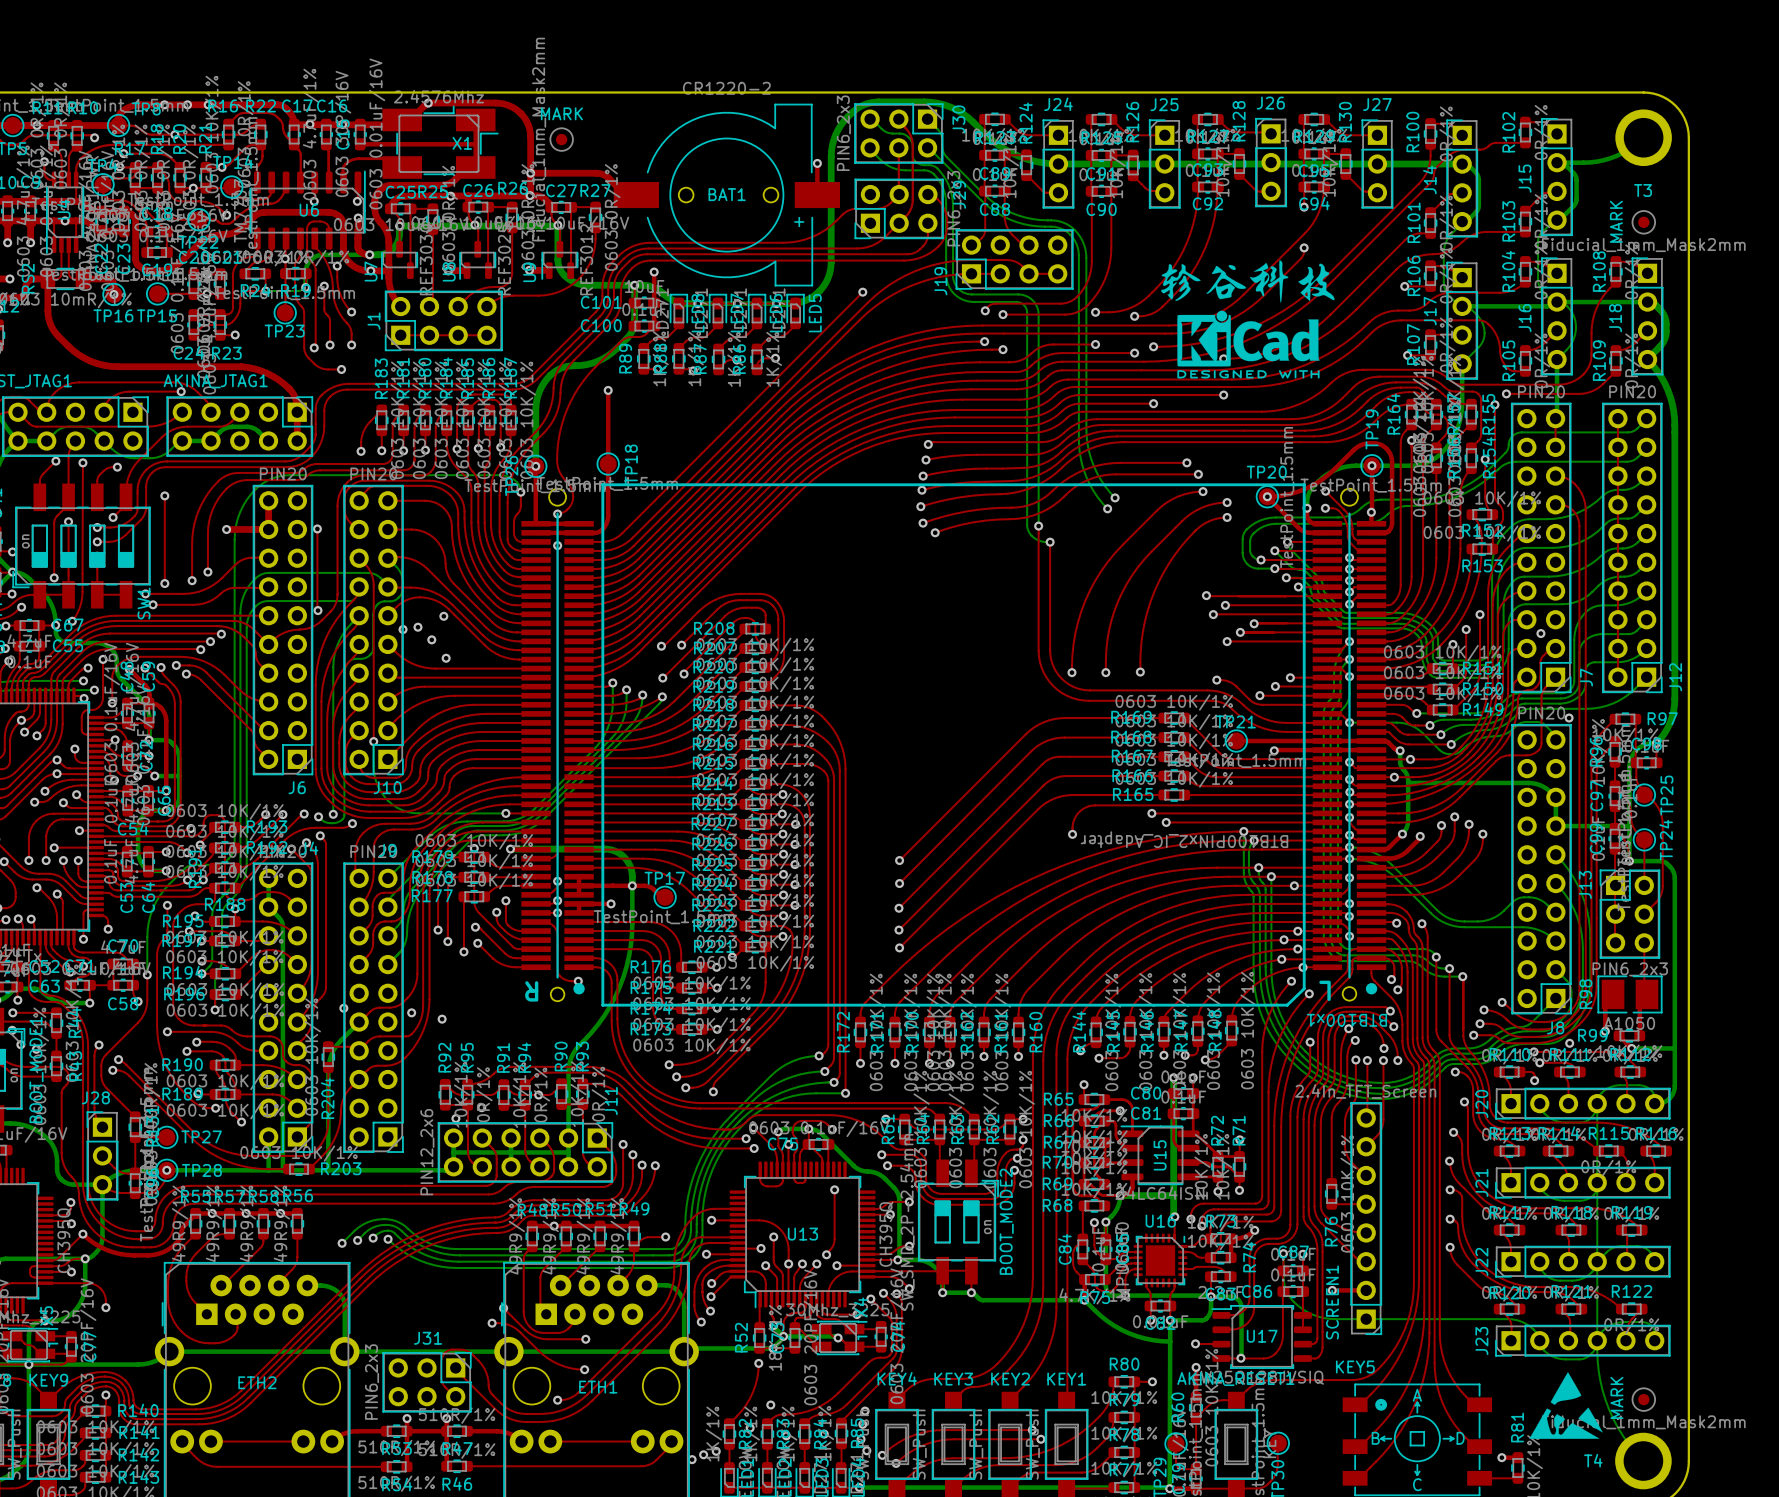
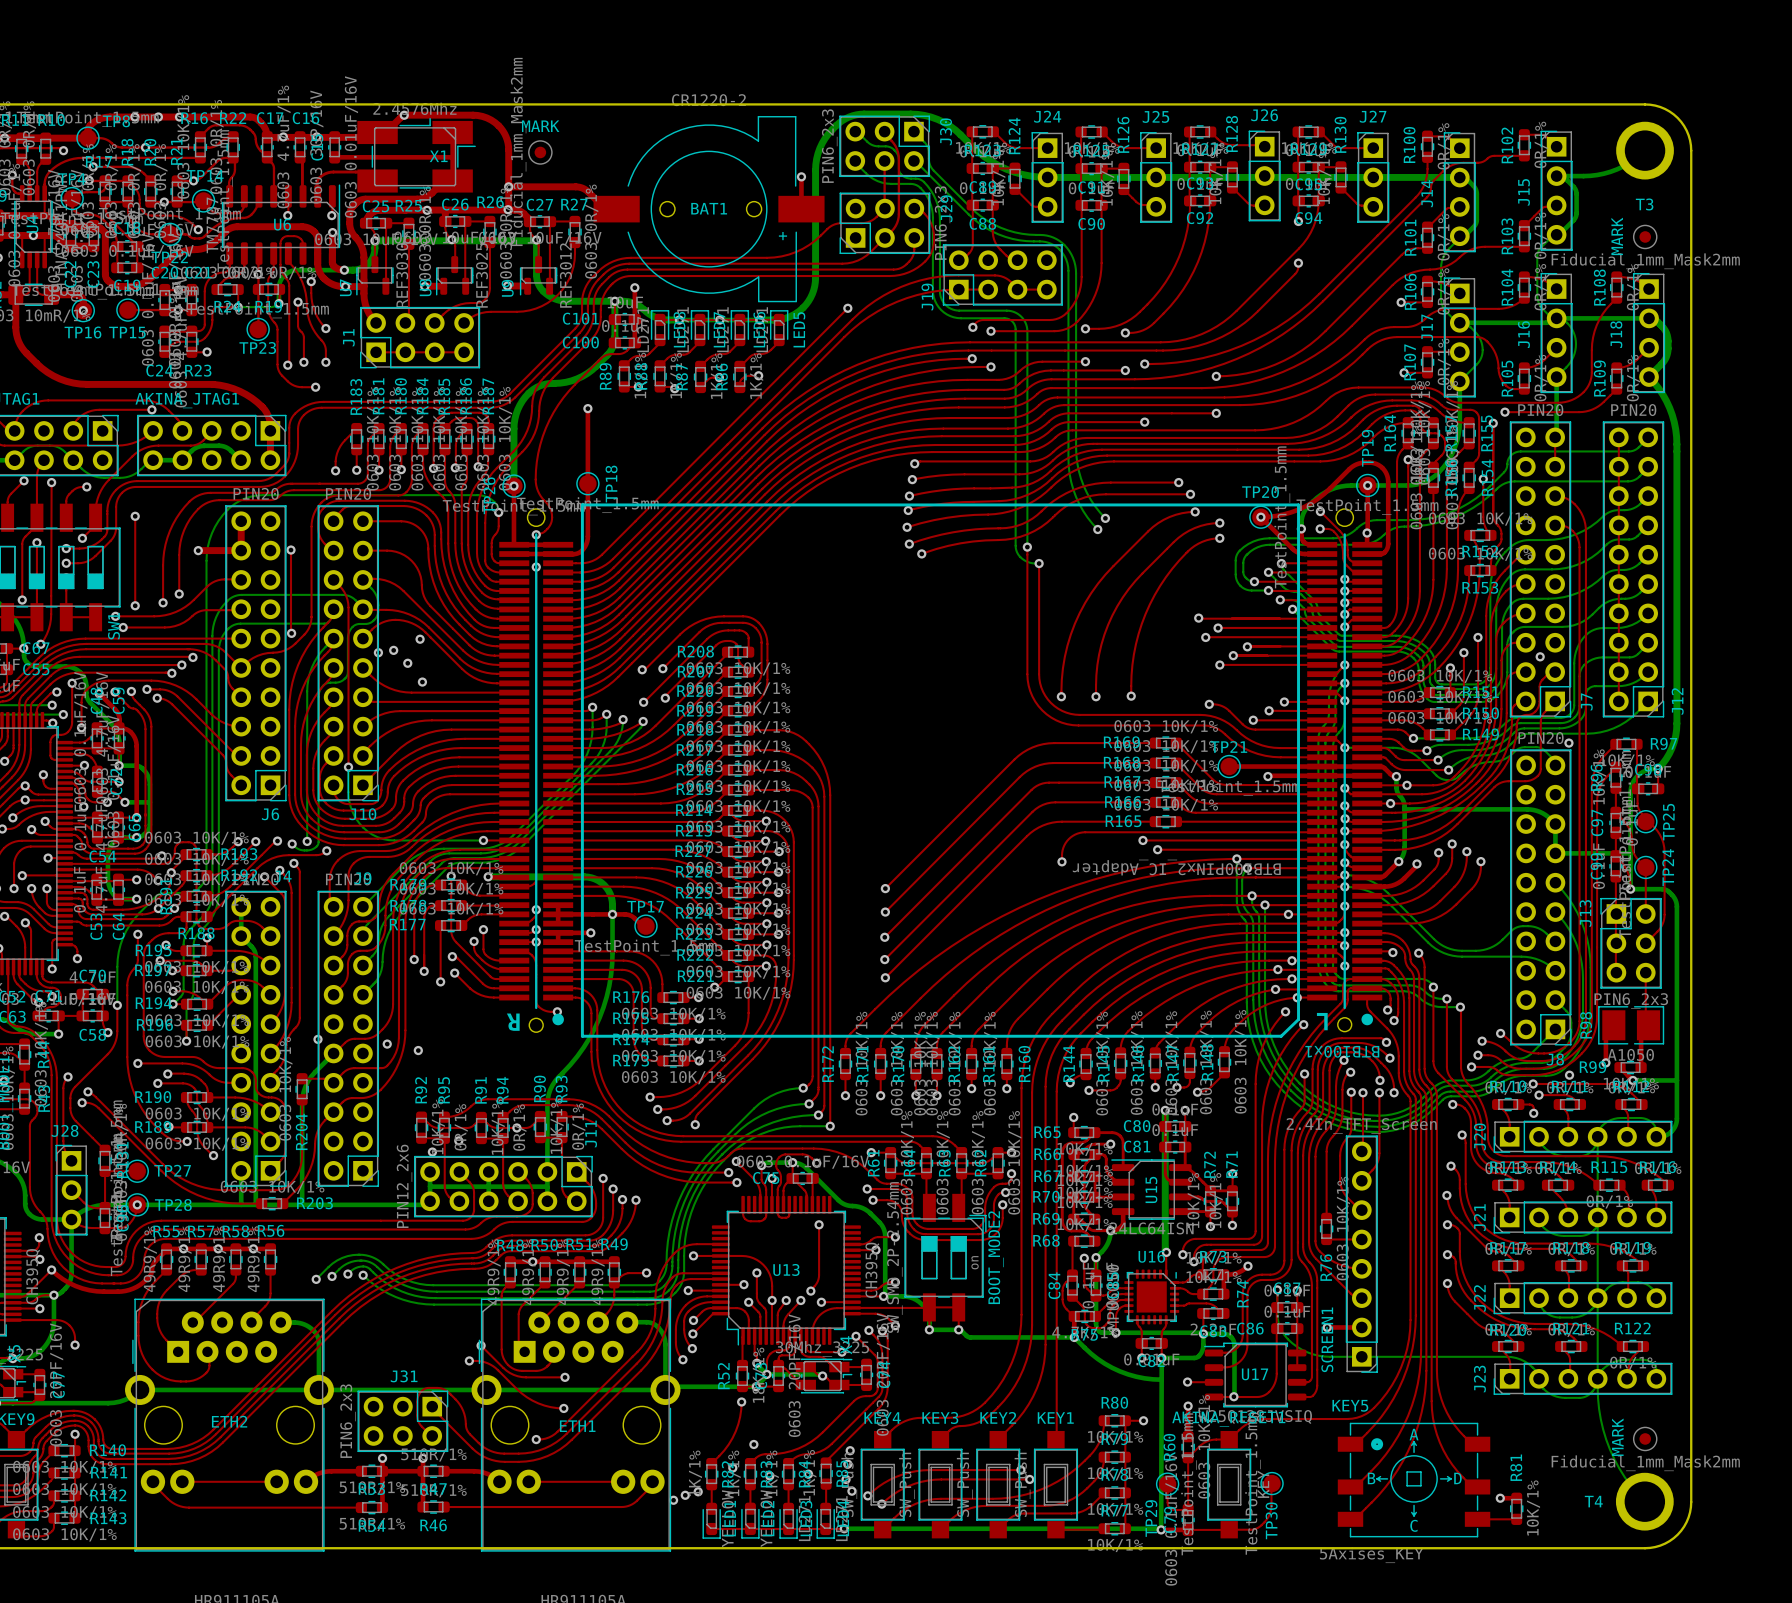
drawing: [1161, 260, 1335, 379] -> none
drawing: [1529, 1372, 1603, 1439] -> none

